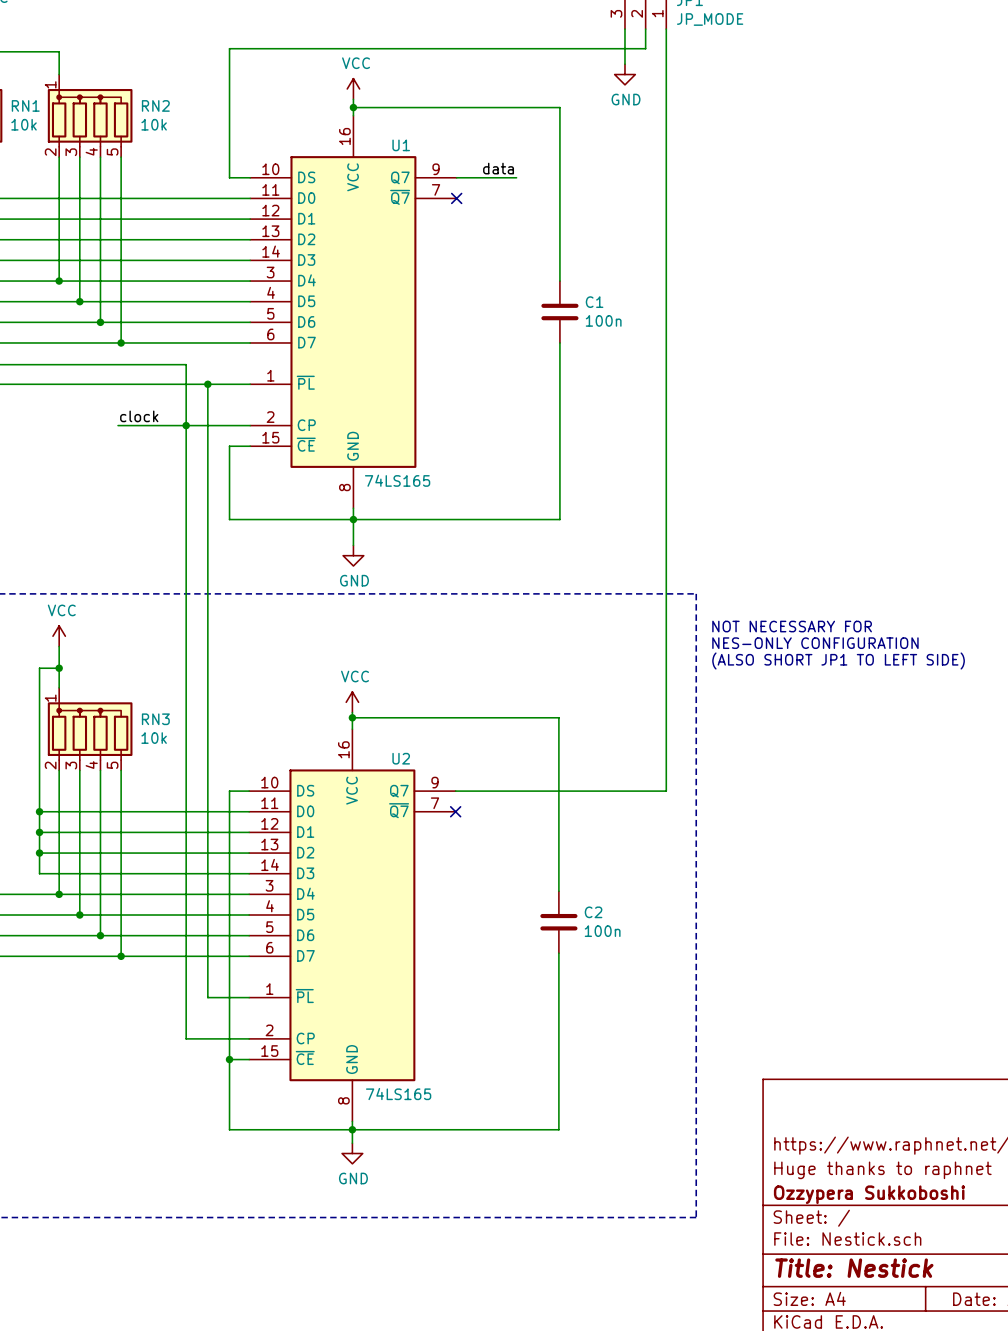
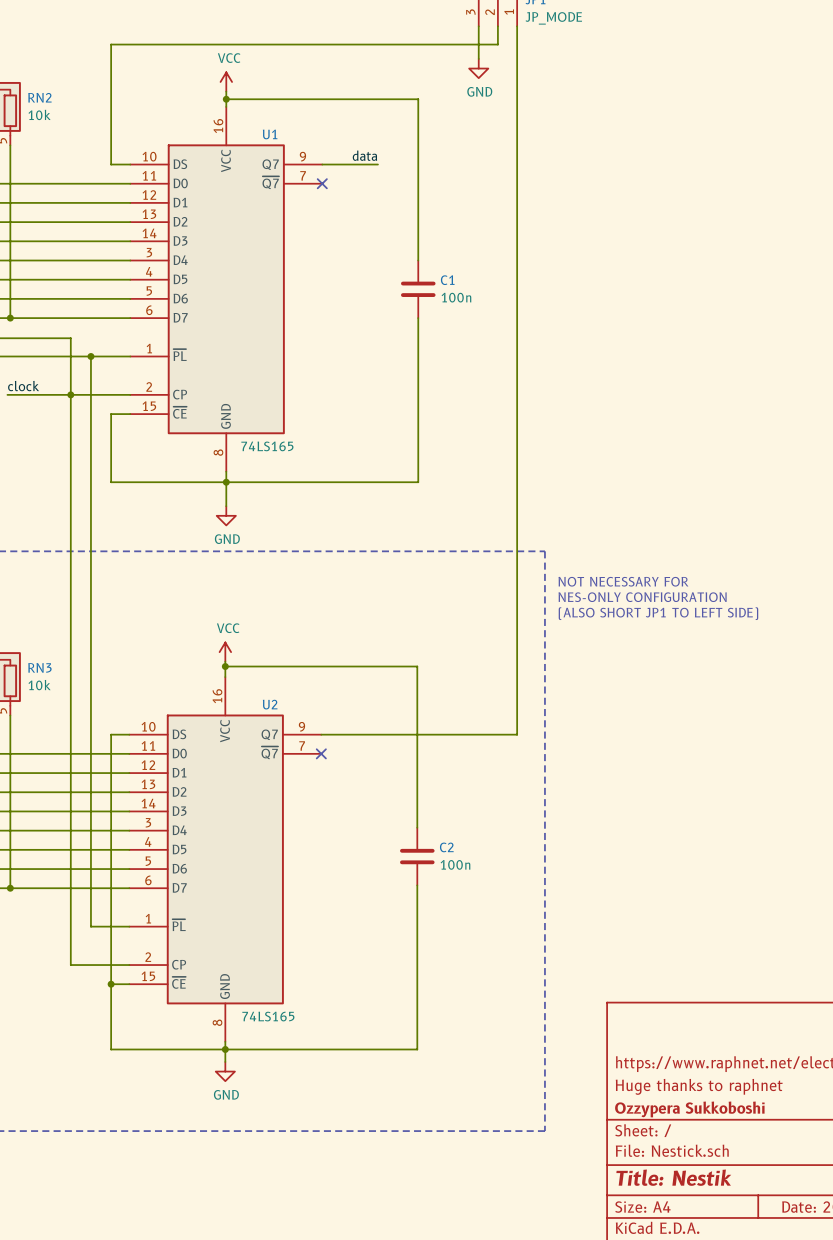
title block: Title: Nestick (854, 1268) -> Title: Nestik (673, 1177)

